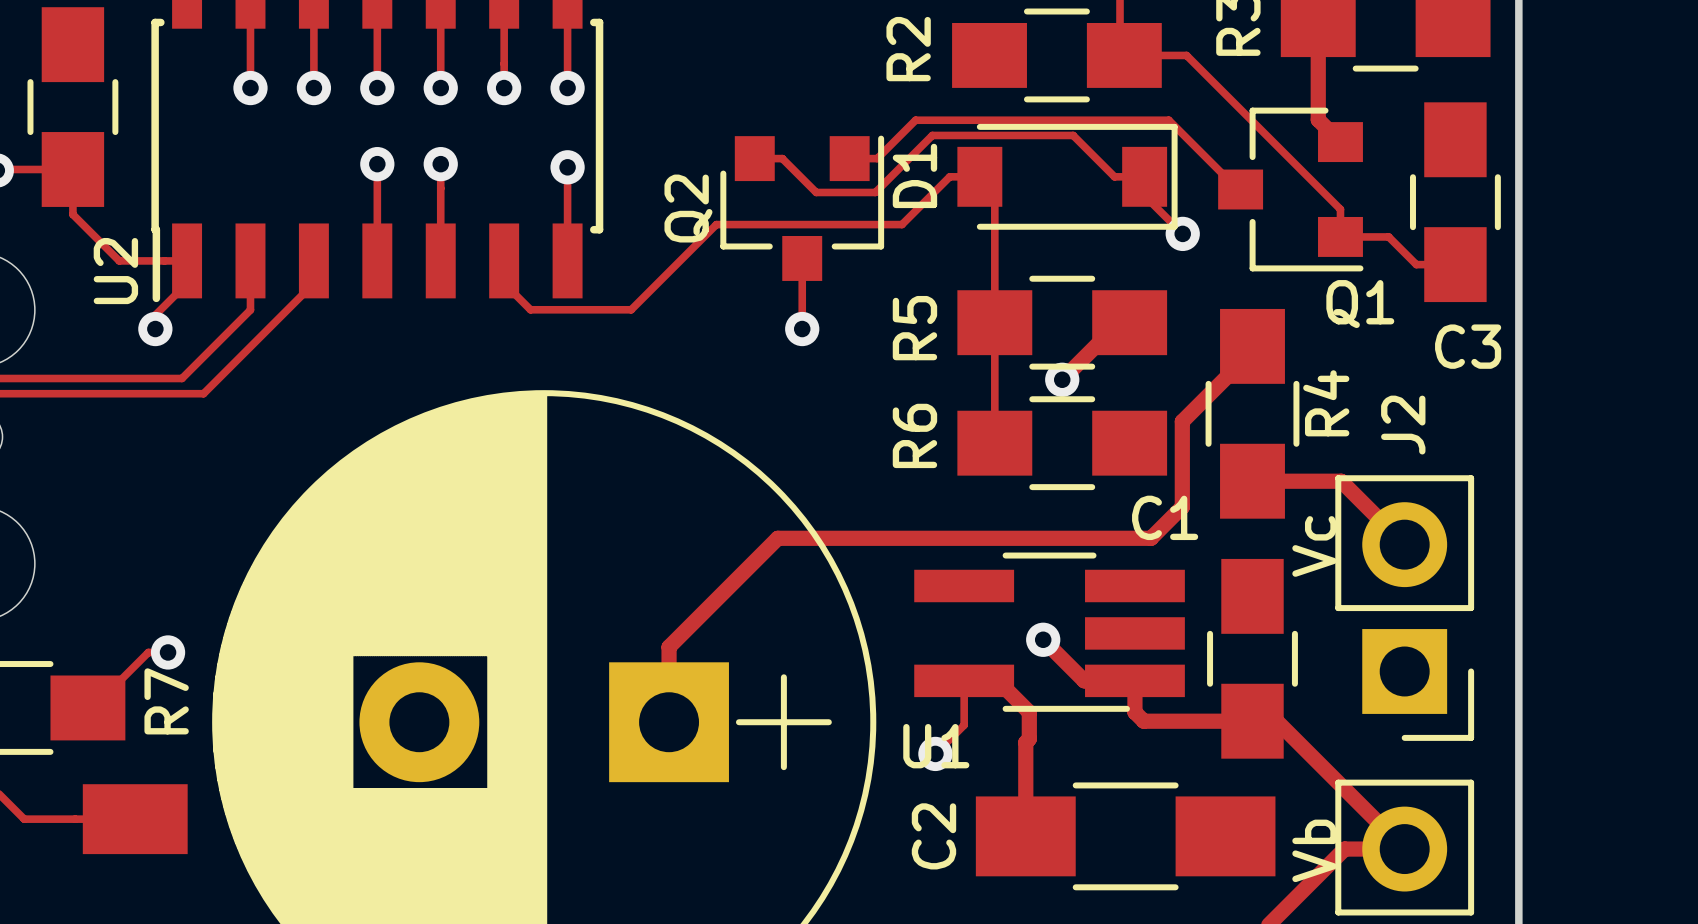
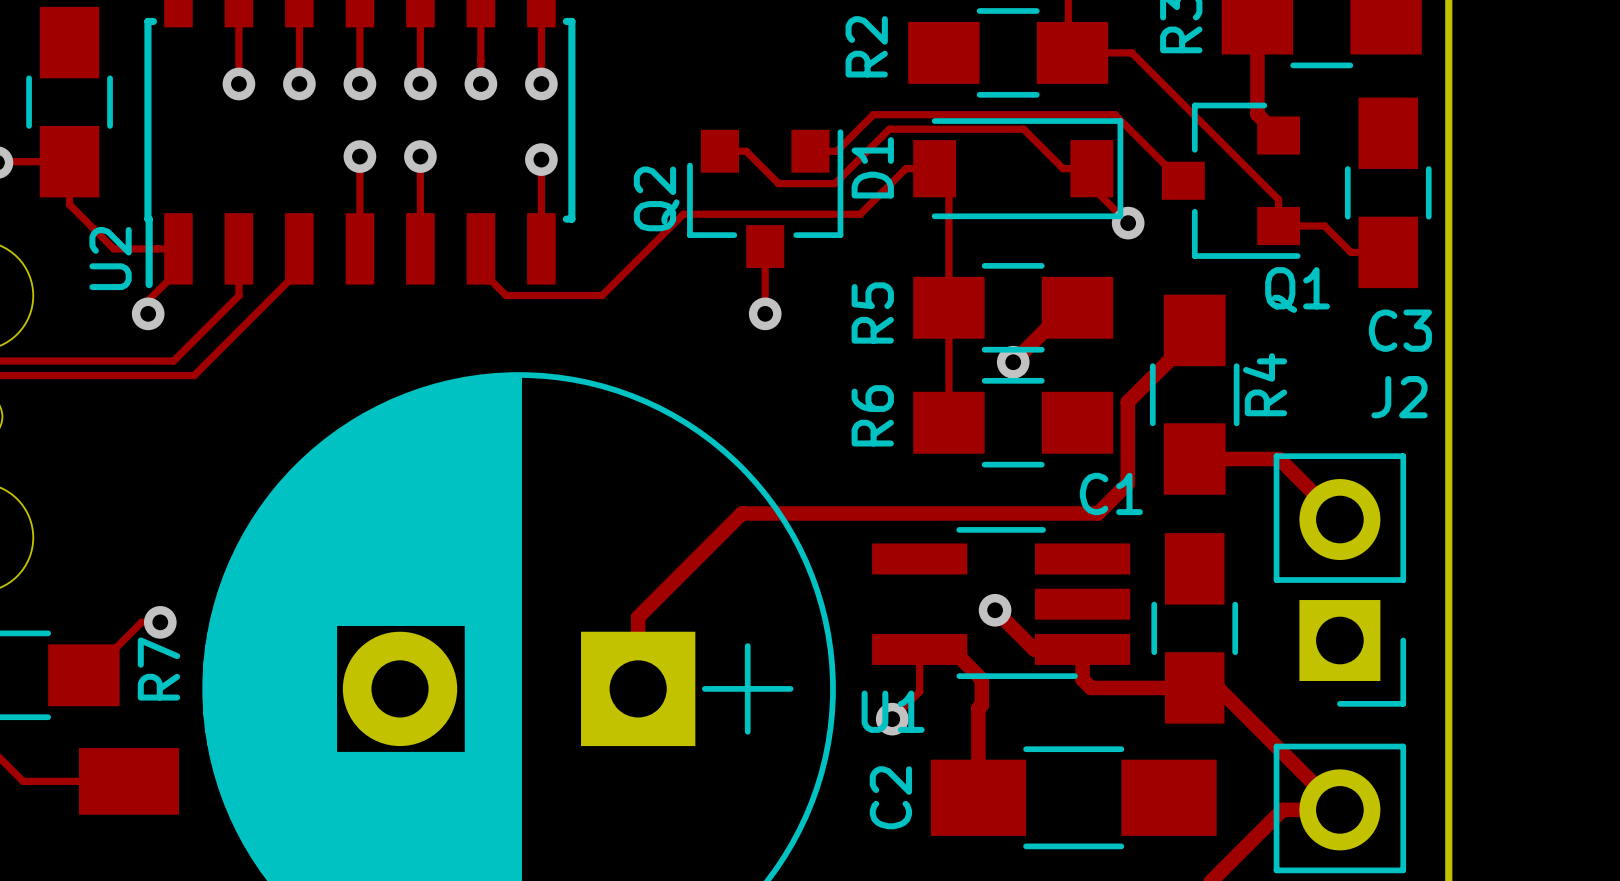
J2 name rotation: 0° (1403, 425) -> 90° clockwise (1399, 397)
text: Vc (1314, 546) -> none
text: Vb (1314, 850) -> none

